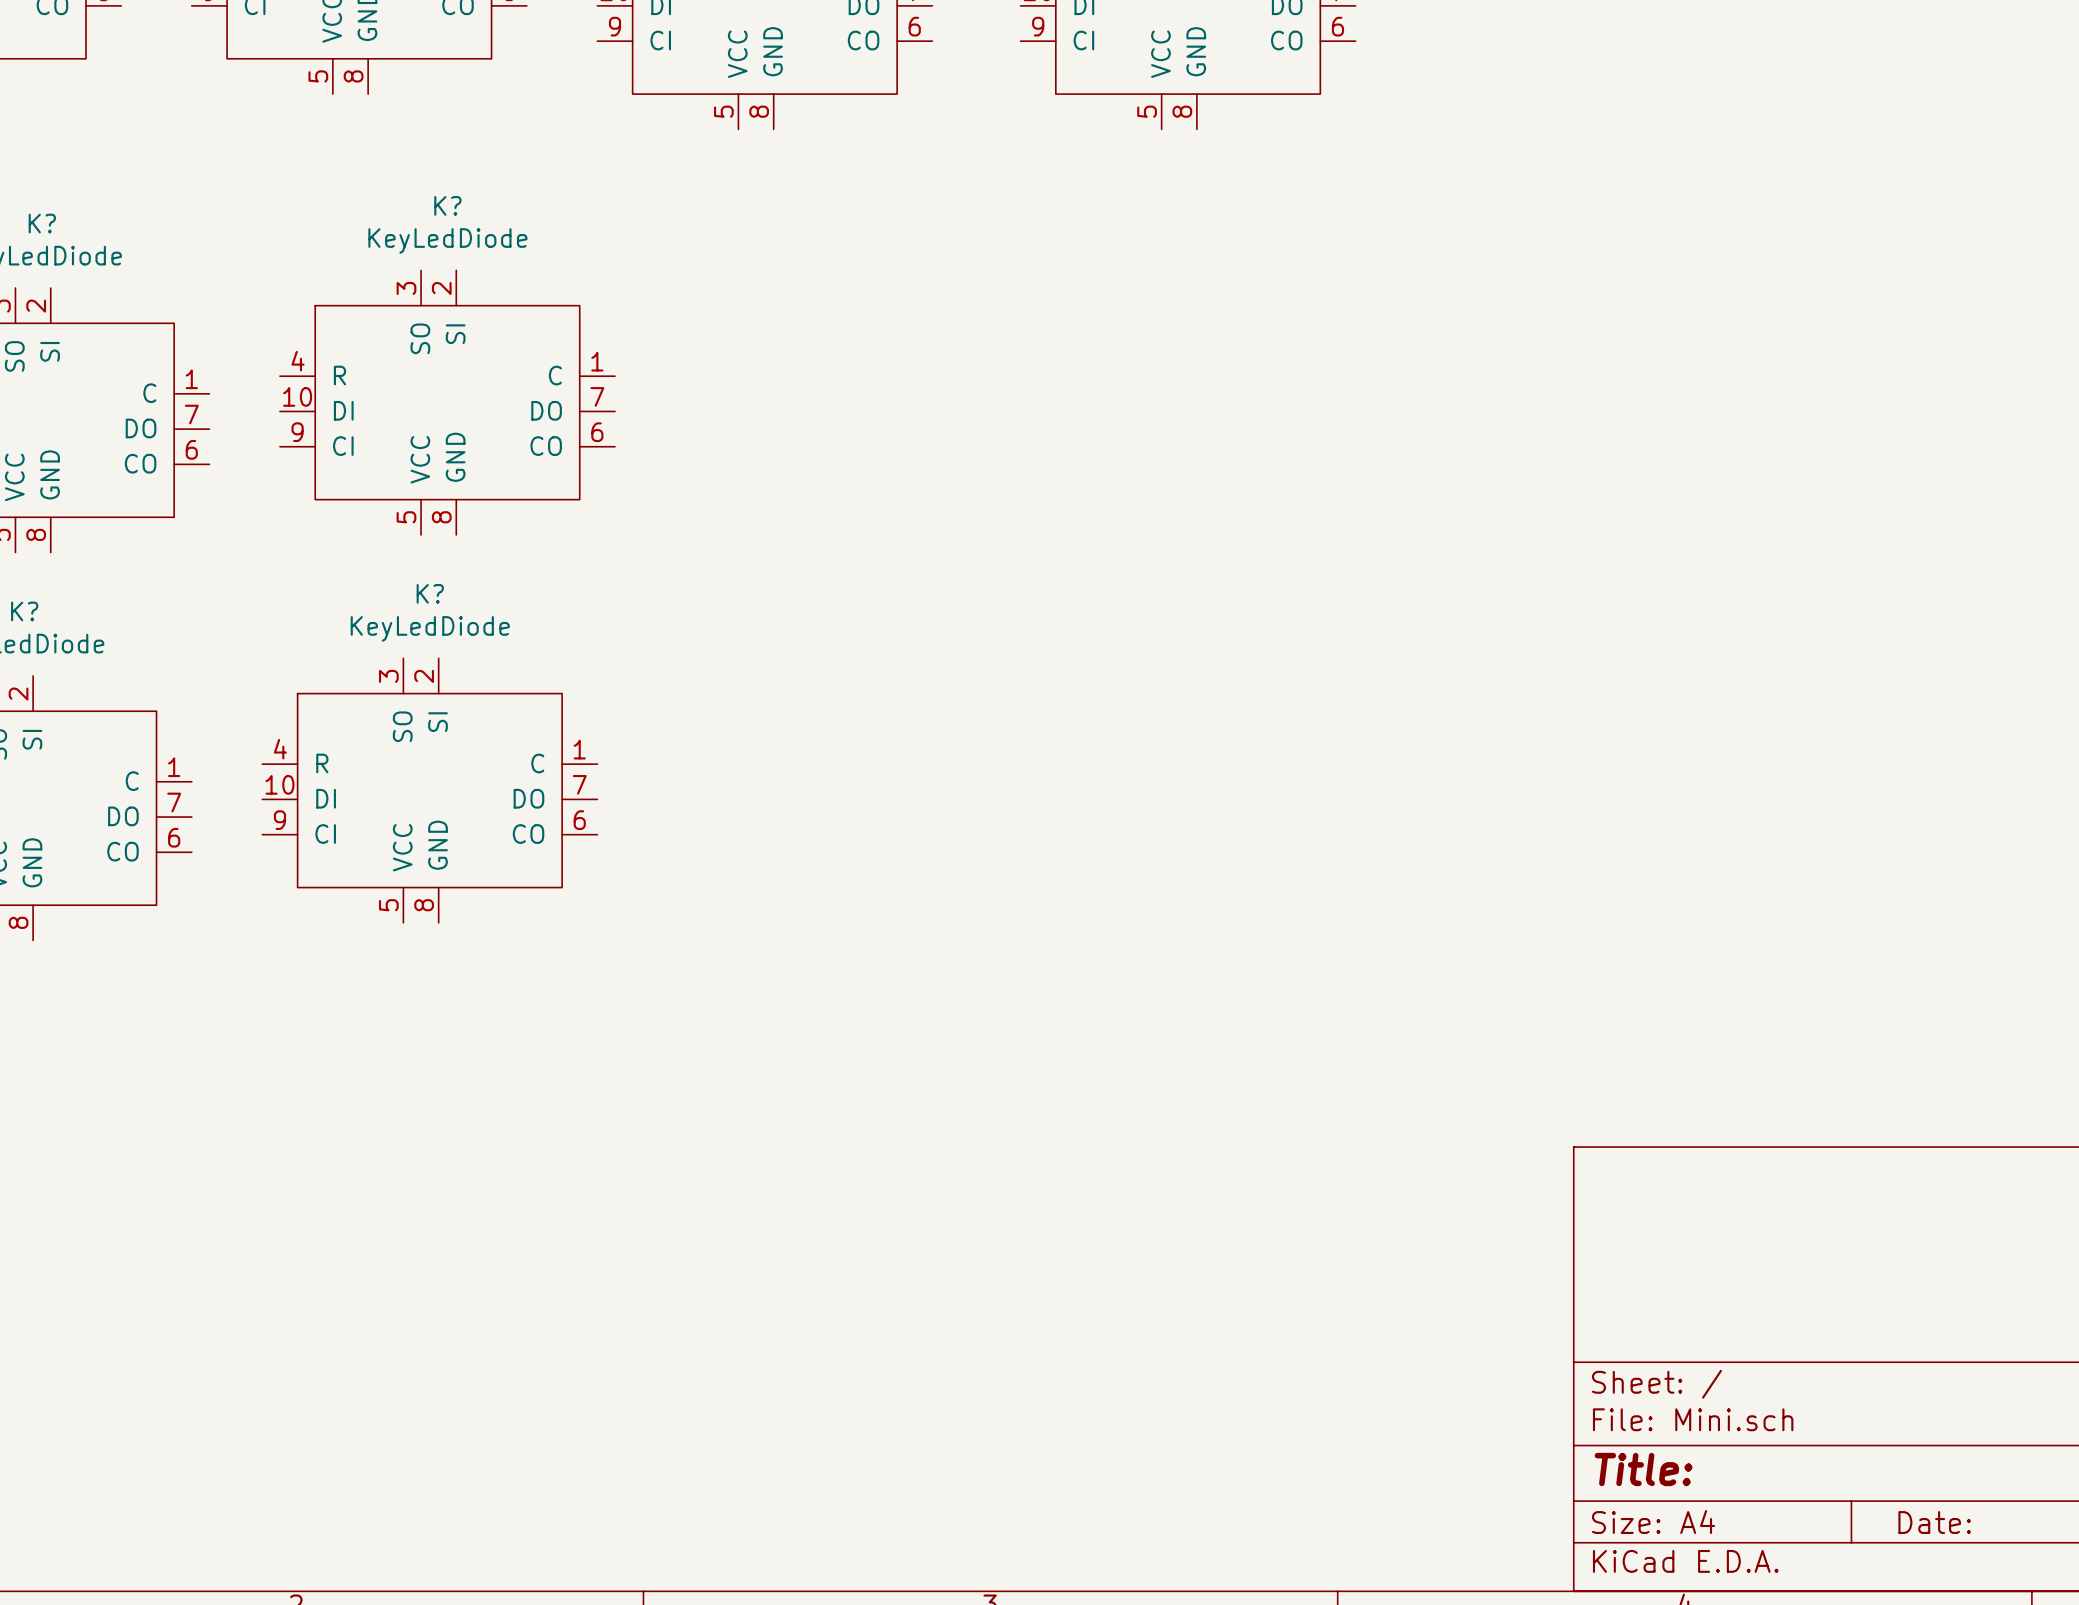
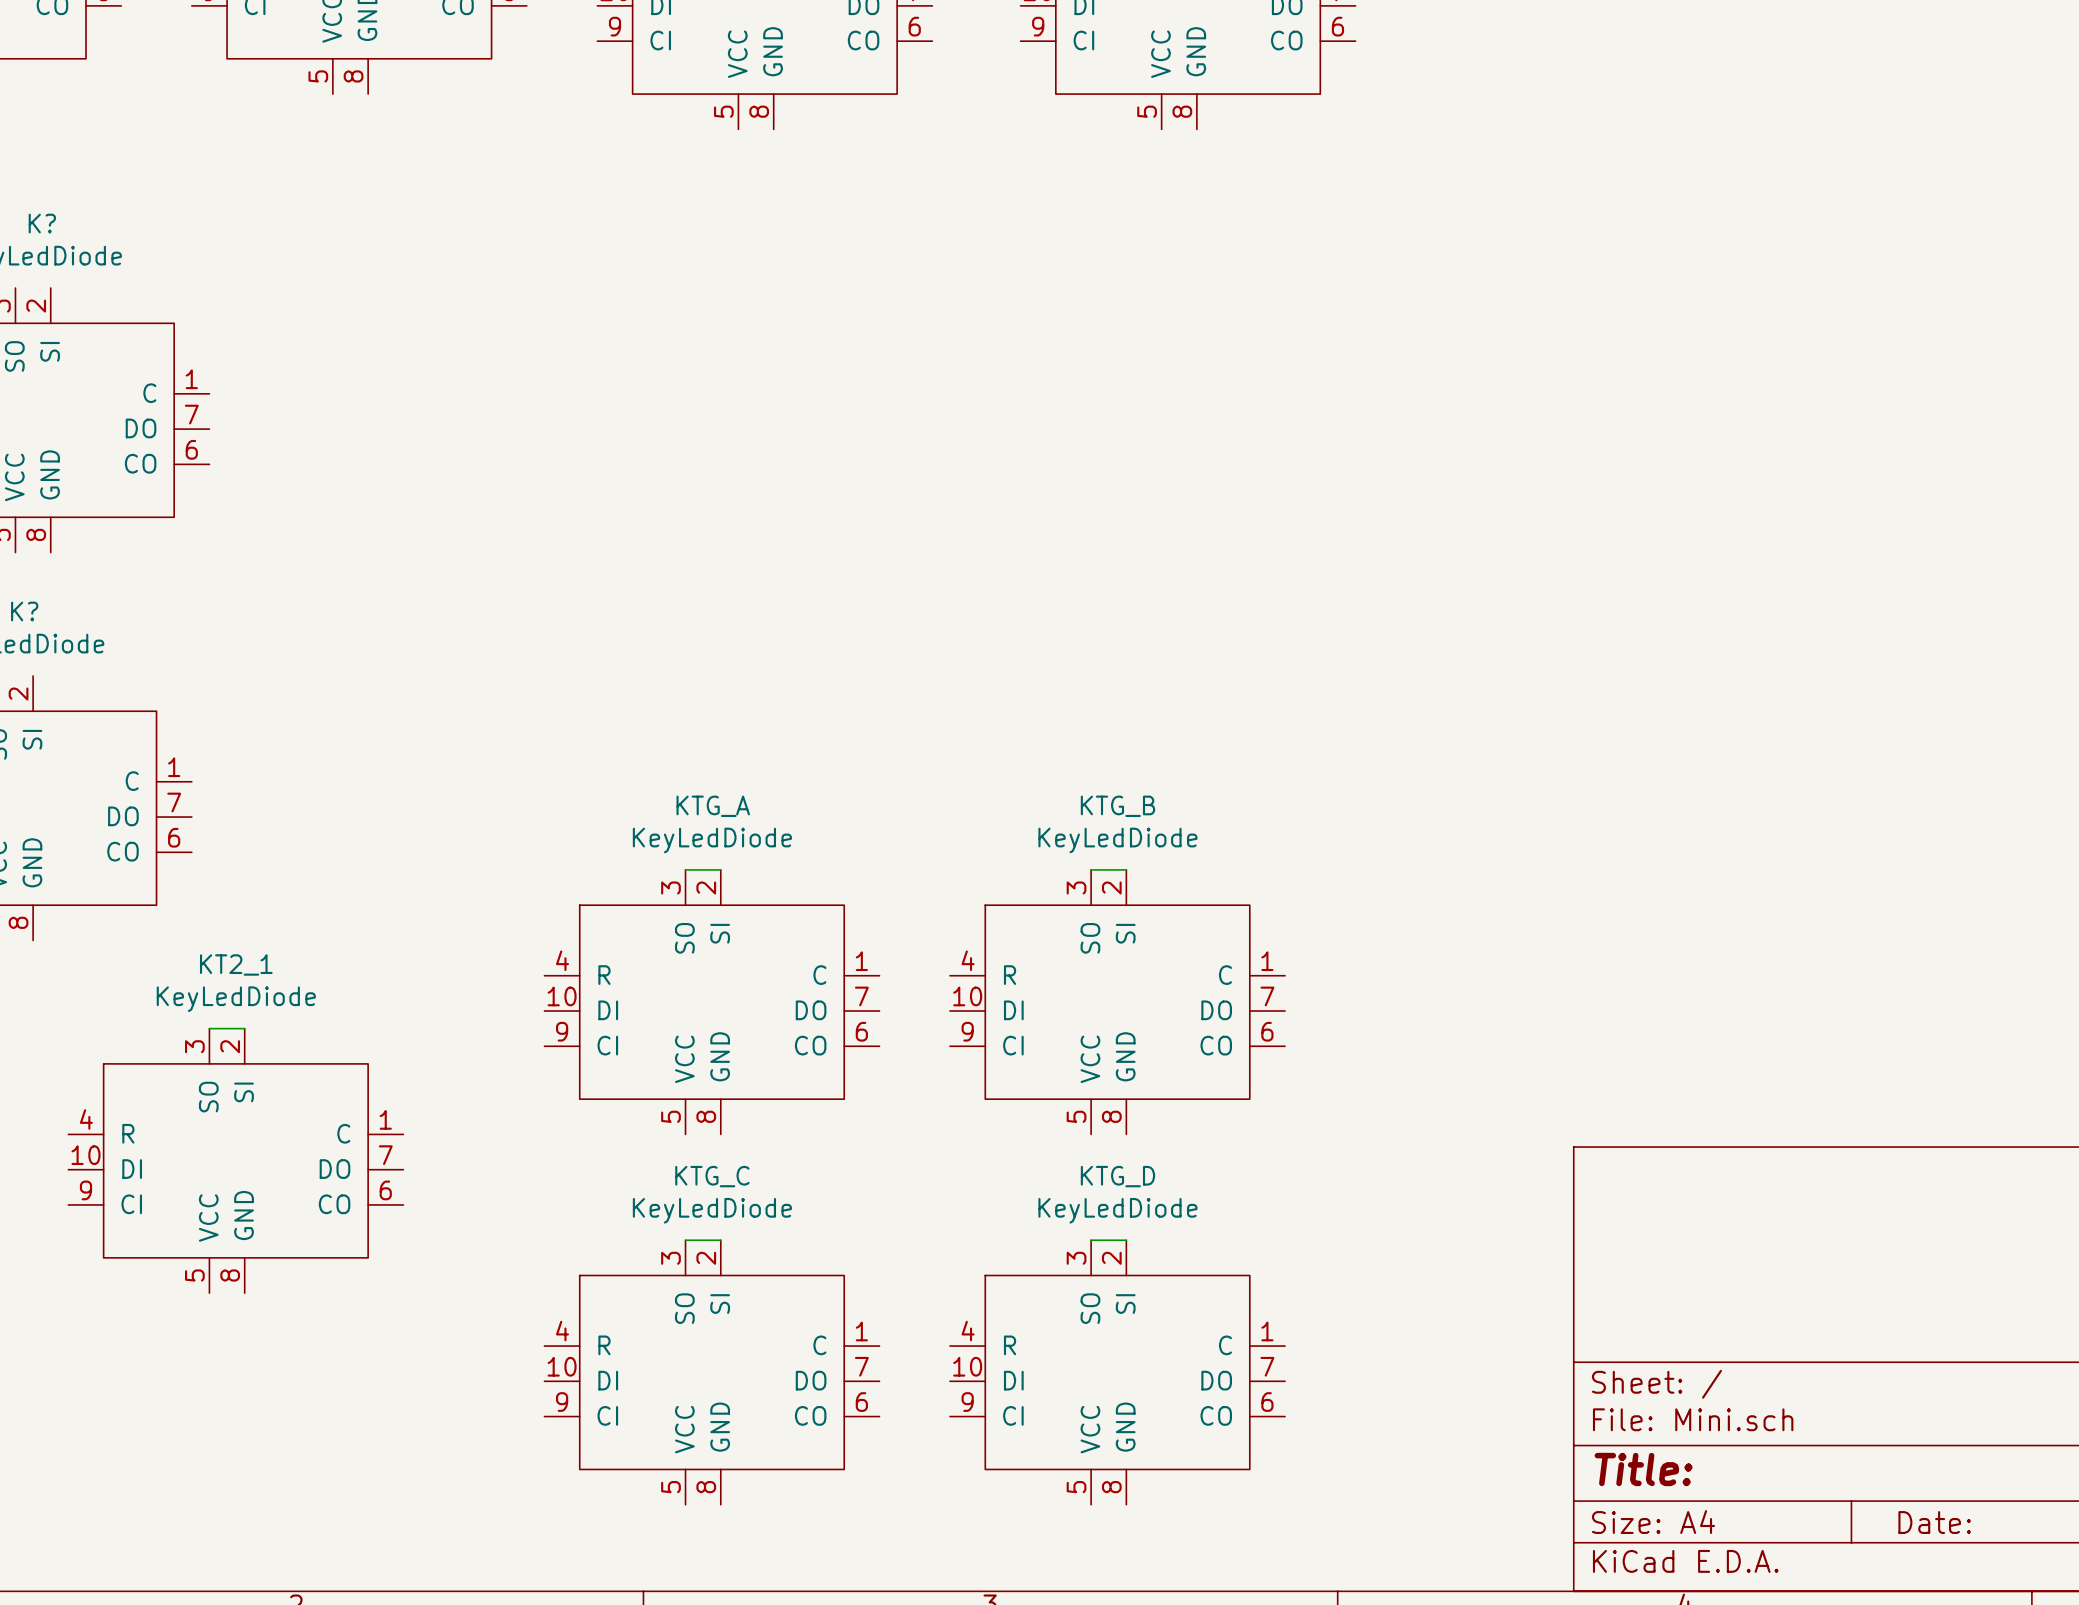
K?: KeyLedDiode (447, 402) -> none
K?: KeyLedDiode (429, 790) -> none
wire: none -> (685, 869) (720, 869)
wire: none -> (1091, 869) (1126, 869)
KTG_A: none -> KeyLedDiode (711, 1002)
KTG_B: none -> KeyLedDiode (1117, 1002)
wire: none -> (209, 1028) (244, 1028)
KT2_1: none -> KeyLedDiode (235, 1160)
wire: none -> (685, 1240) (720, 1240)
wire: none -> (1091, 1240) (1126, 1240)
KTG_C: none -> KeyLedDiode (711, 1372)
KTG_D: none -> KeyLedDiode (1117, 1372)

